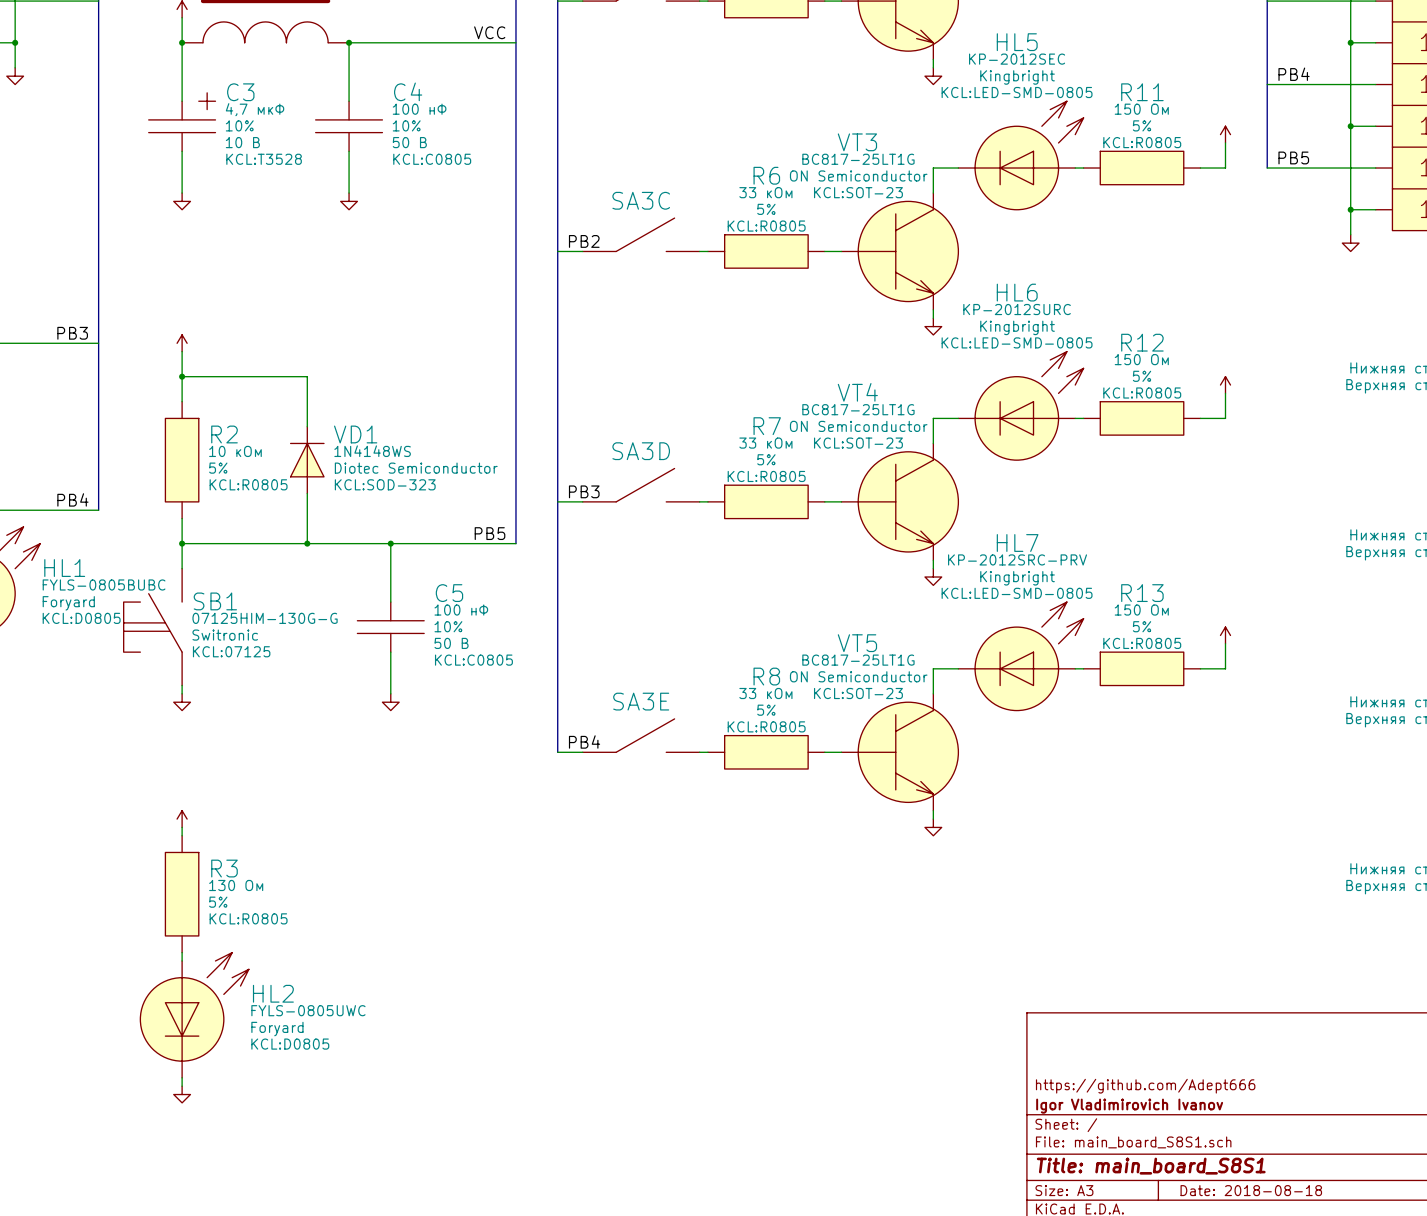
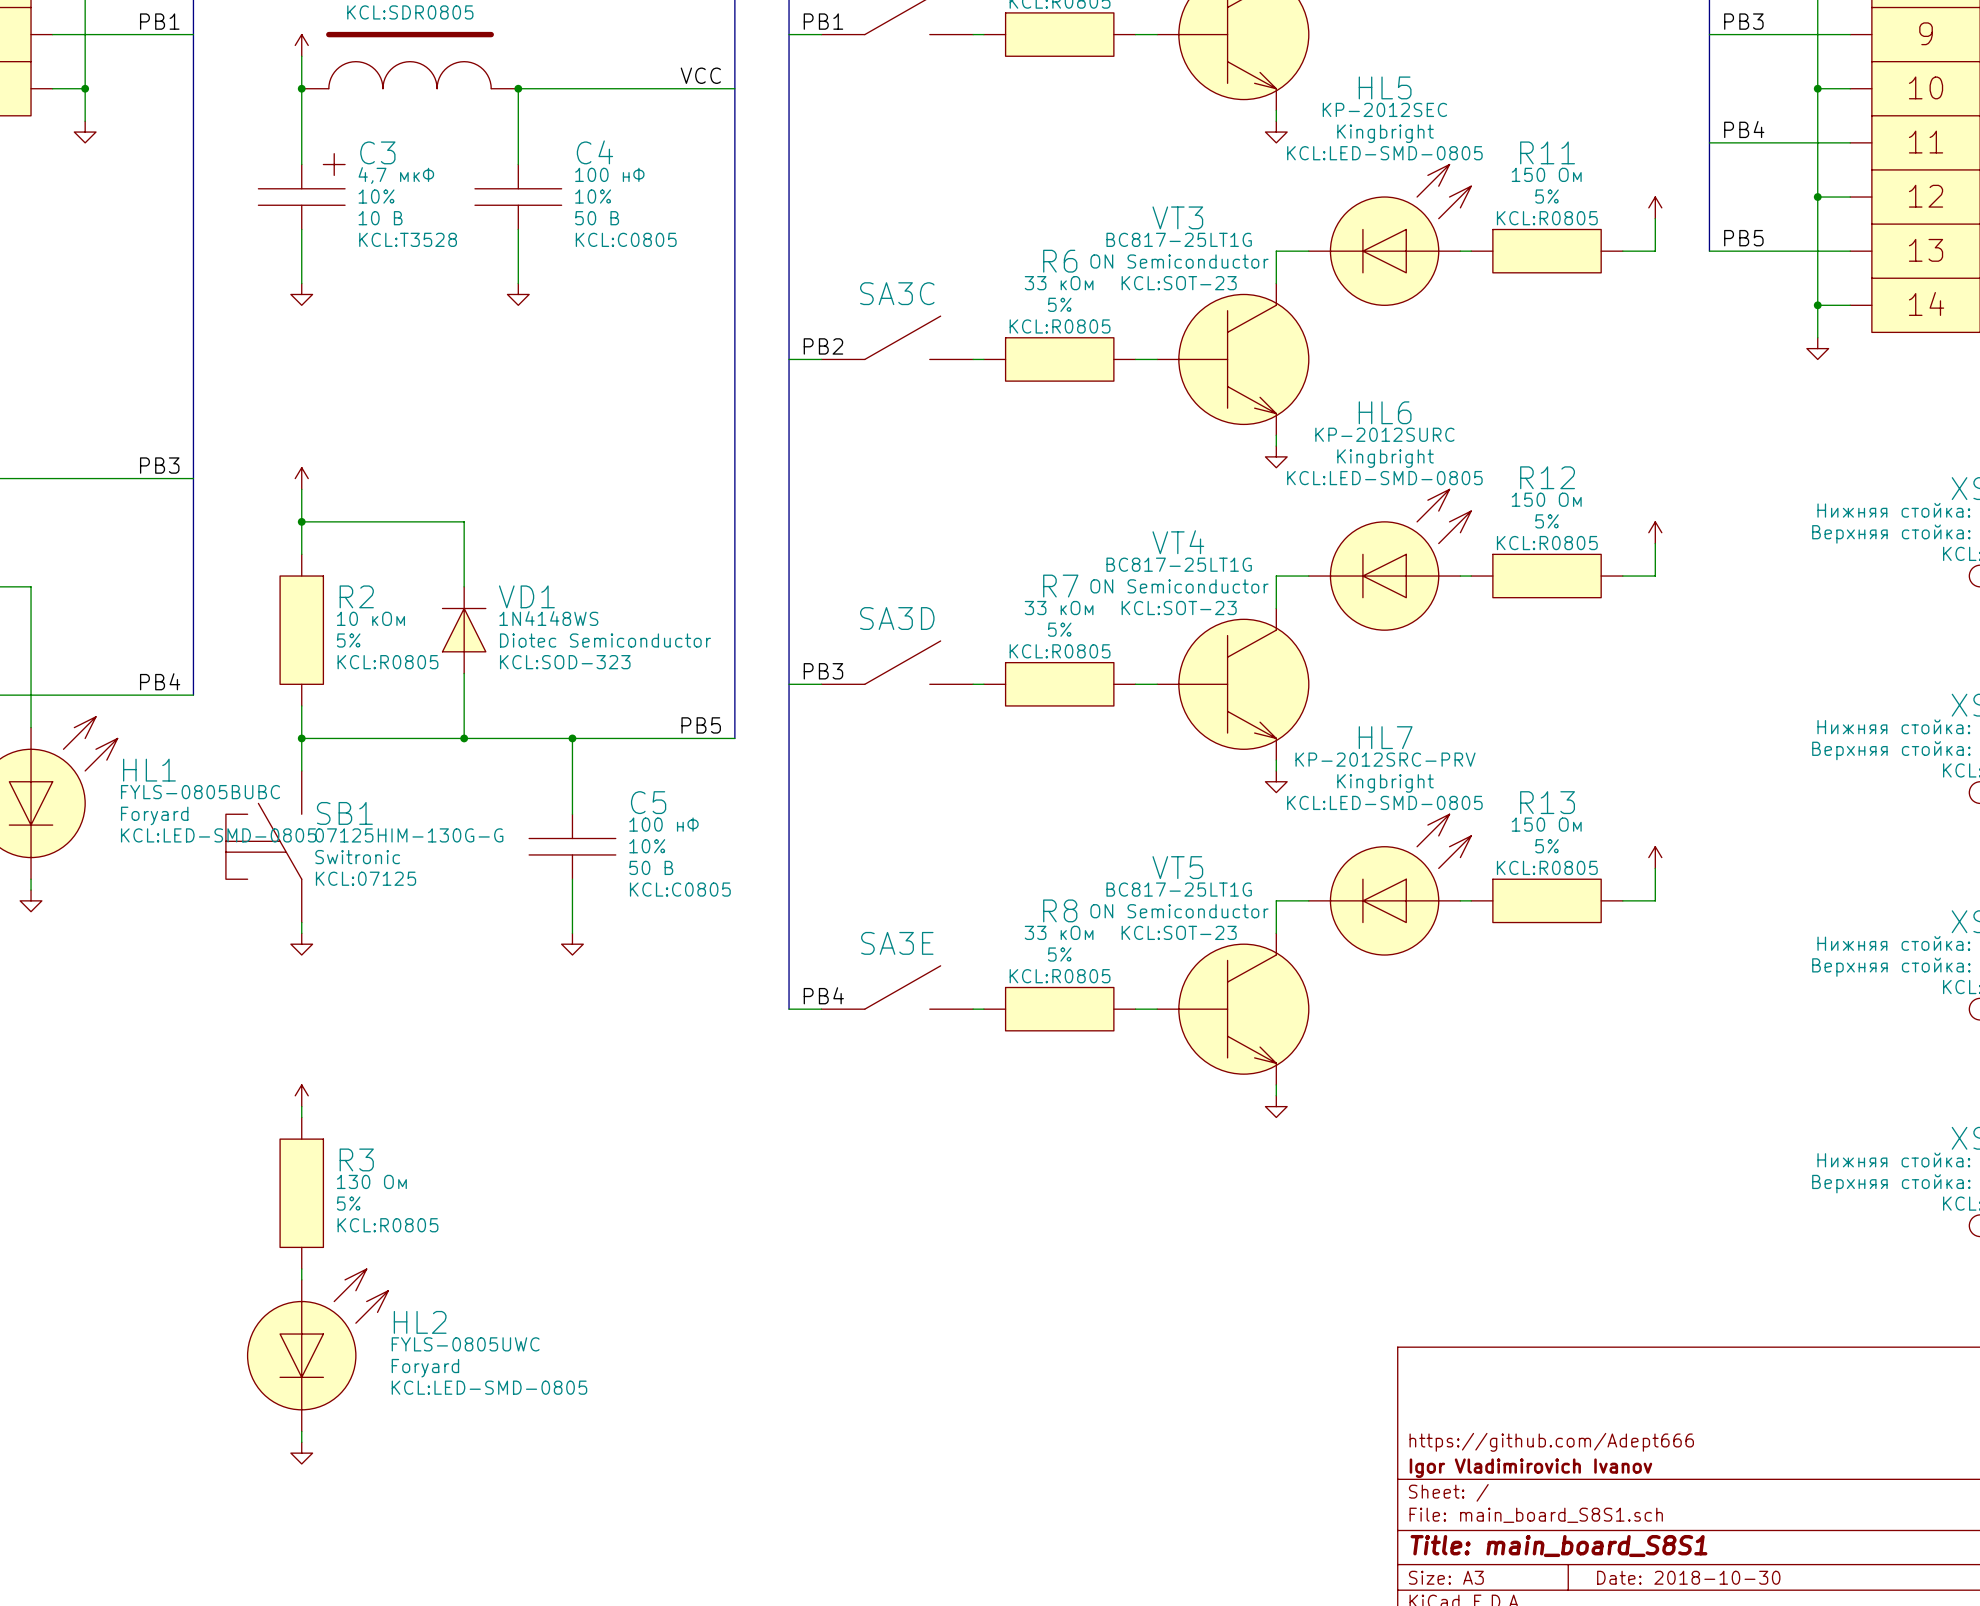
HL1 text: KCL:D0805 (81, 618) -> KCL:LED-SMD-0805 (218, 835)
HL2 text: KCL:D0805 (290, 1044) -> KCL:LED-SMD-0805 (489, 1387)
title block: Date: 2018-08-18 (1251, 1190) -> Date: 2018-10-30 (1688, 1577)

